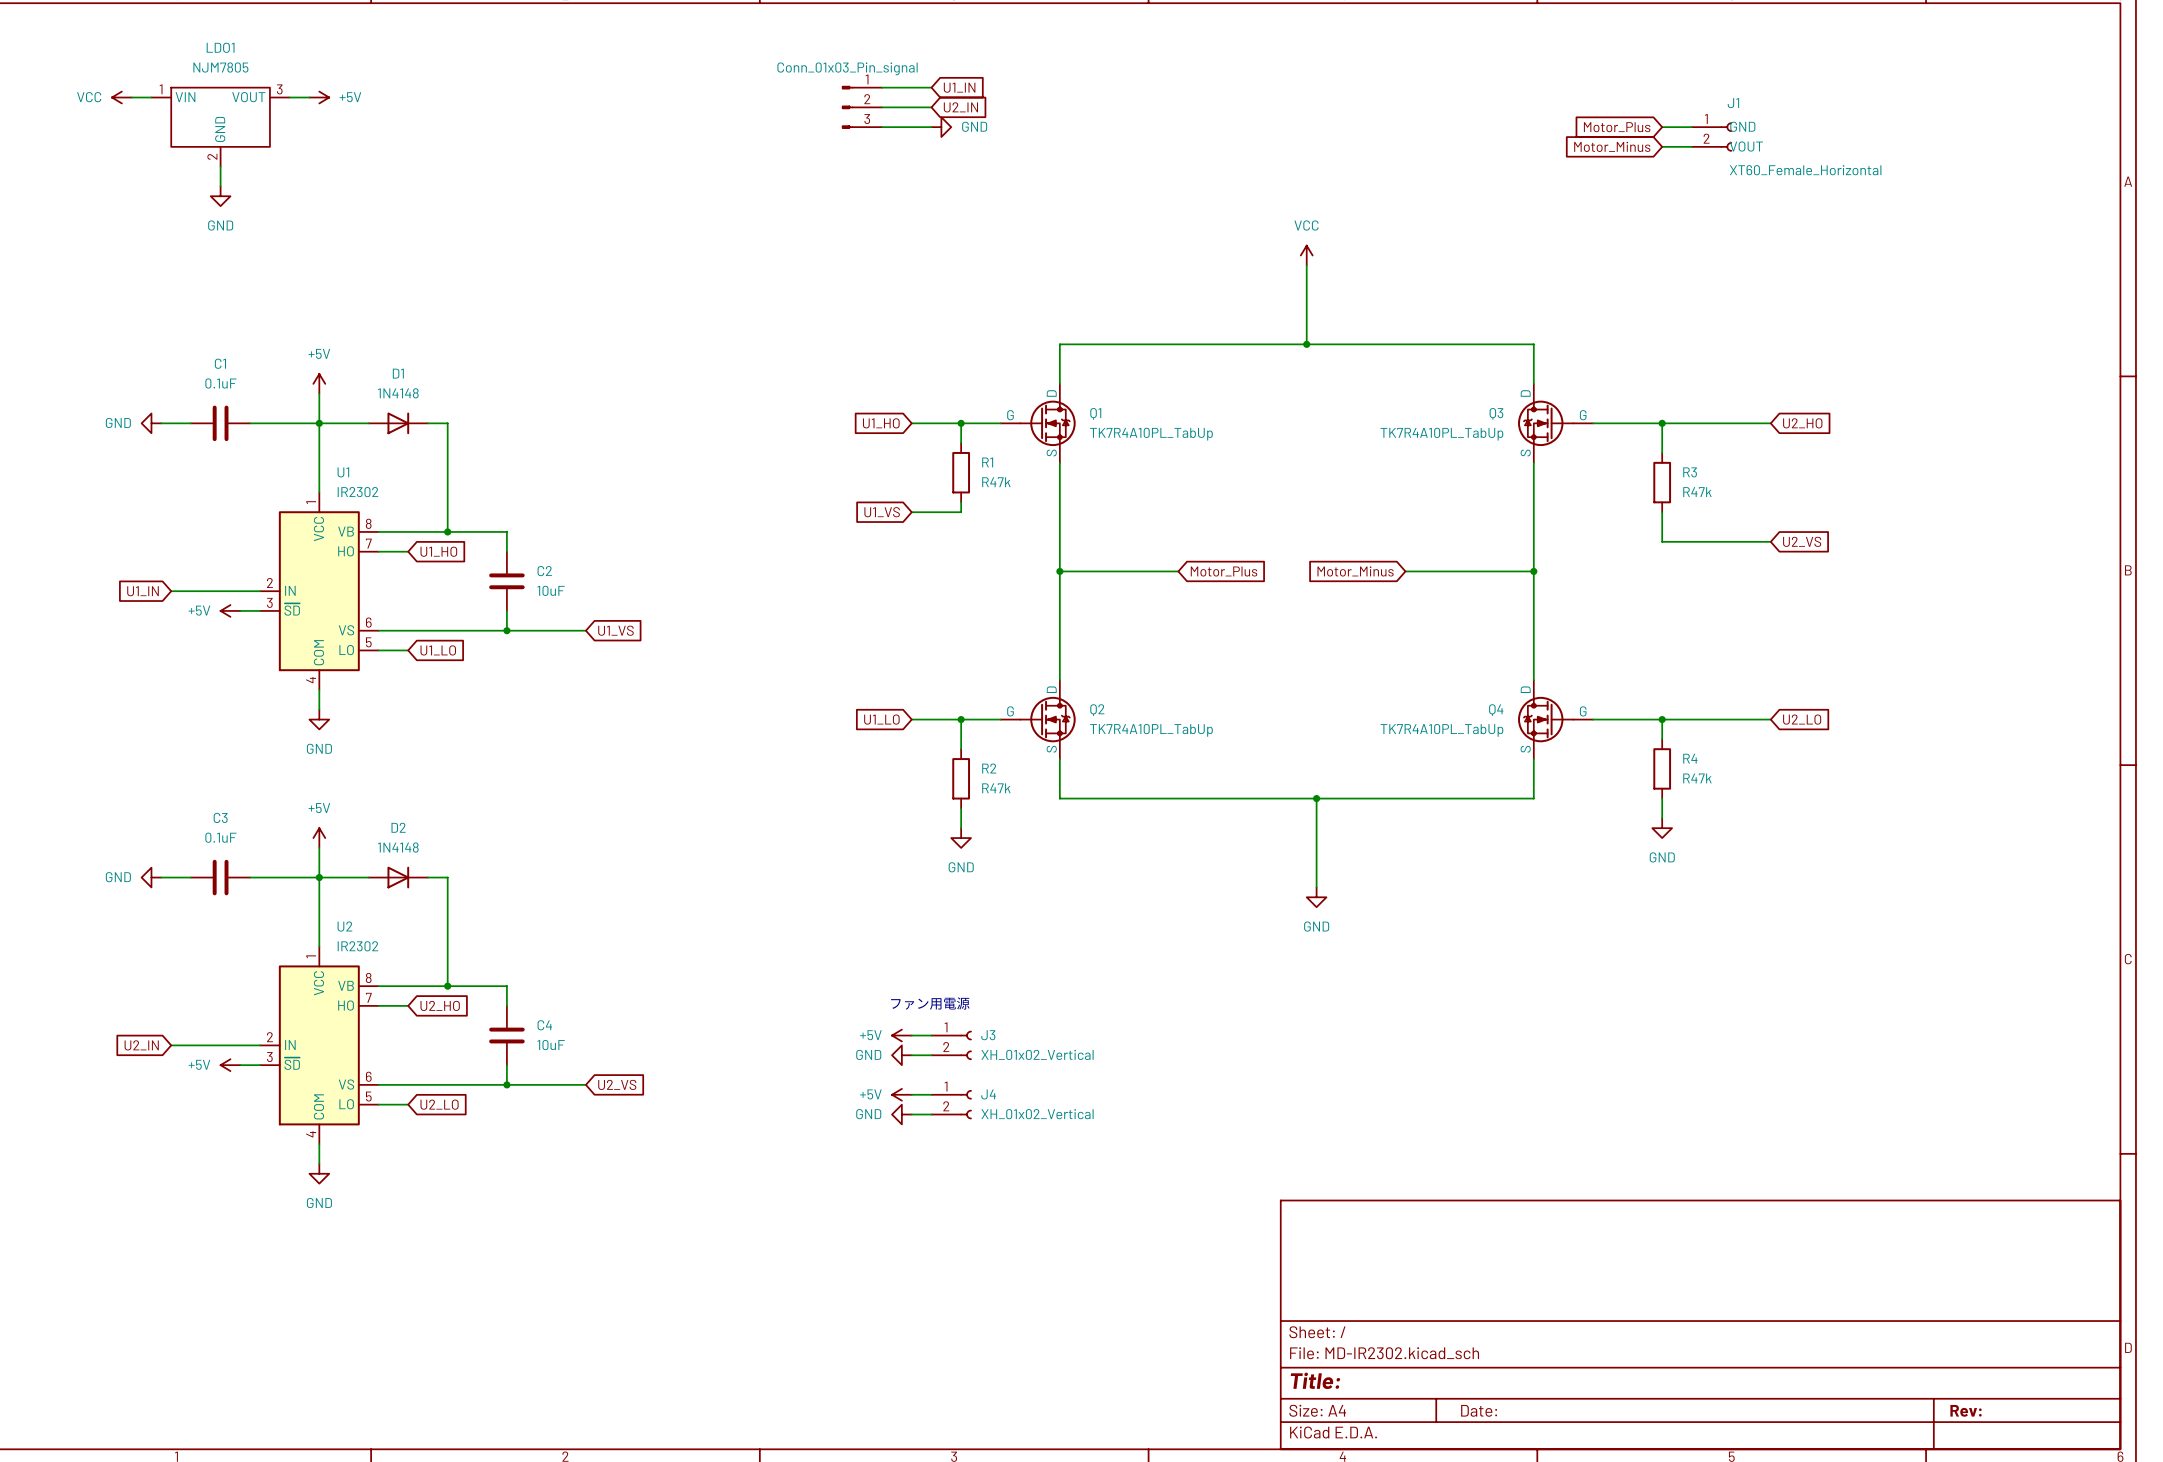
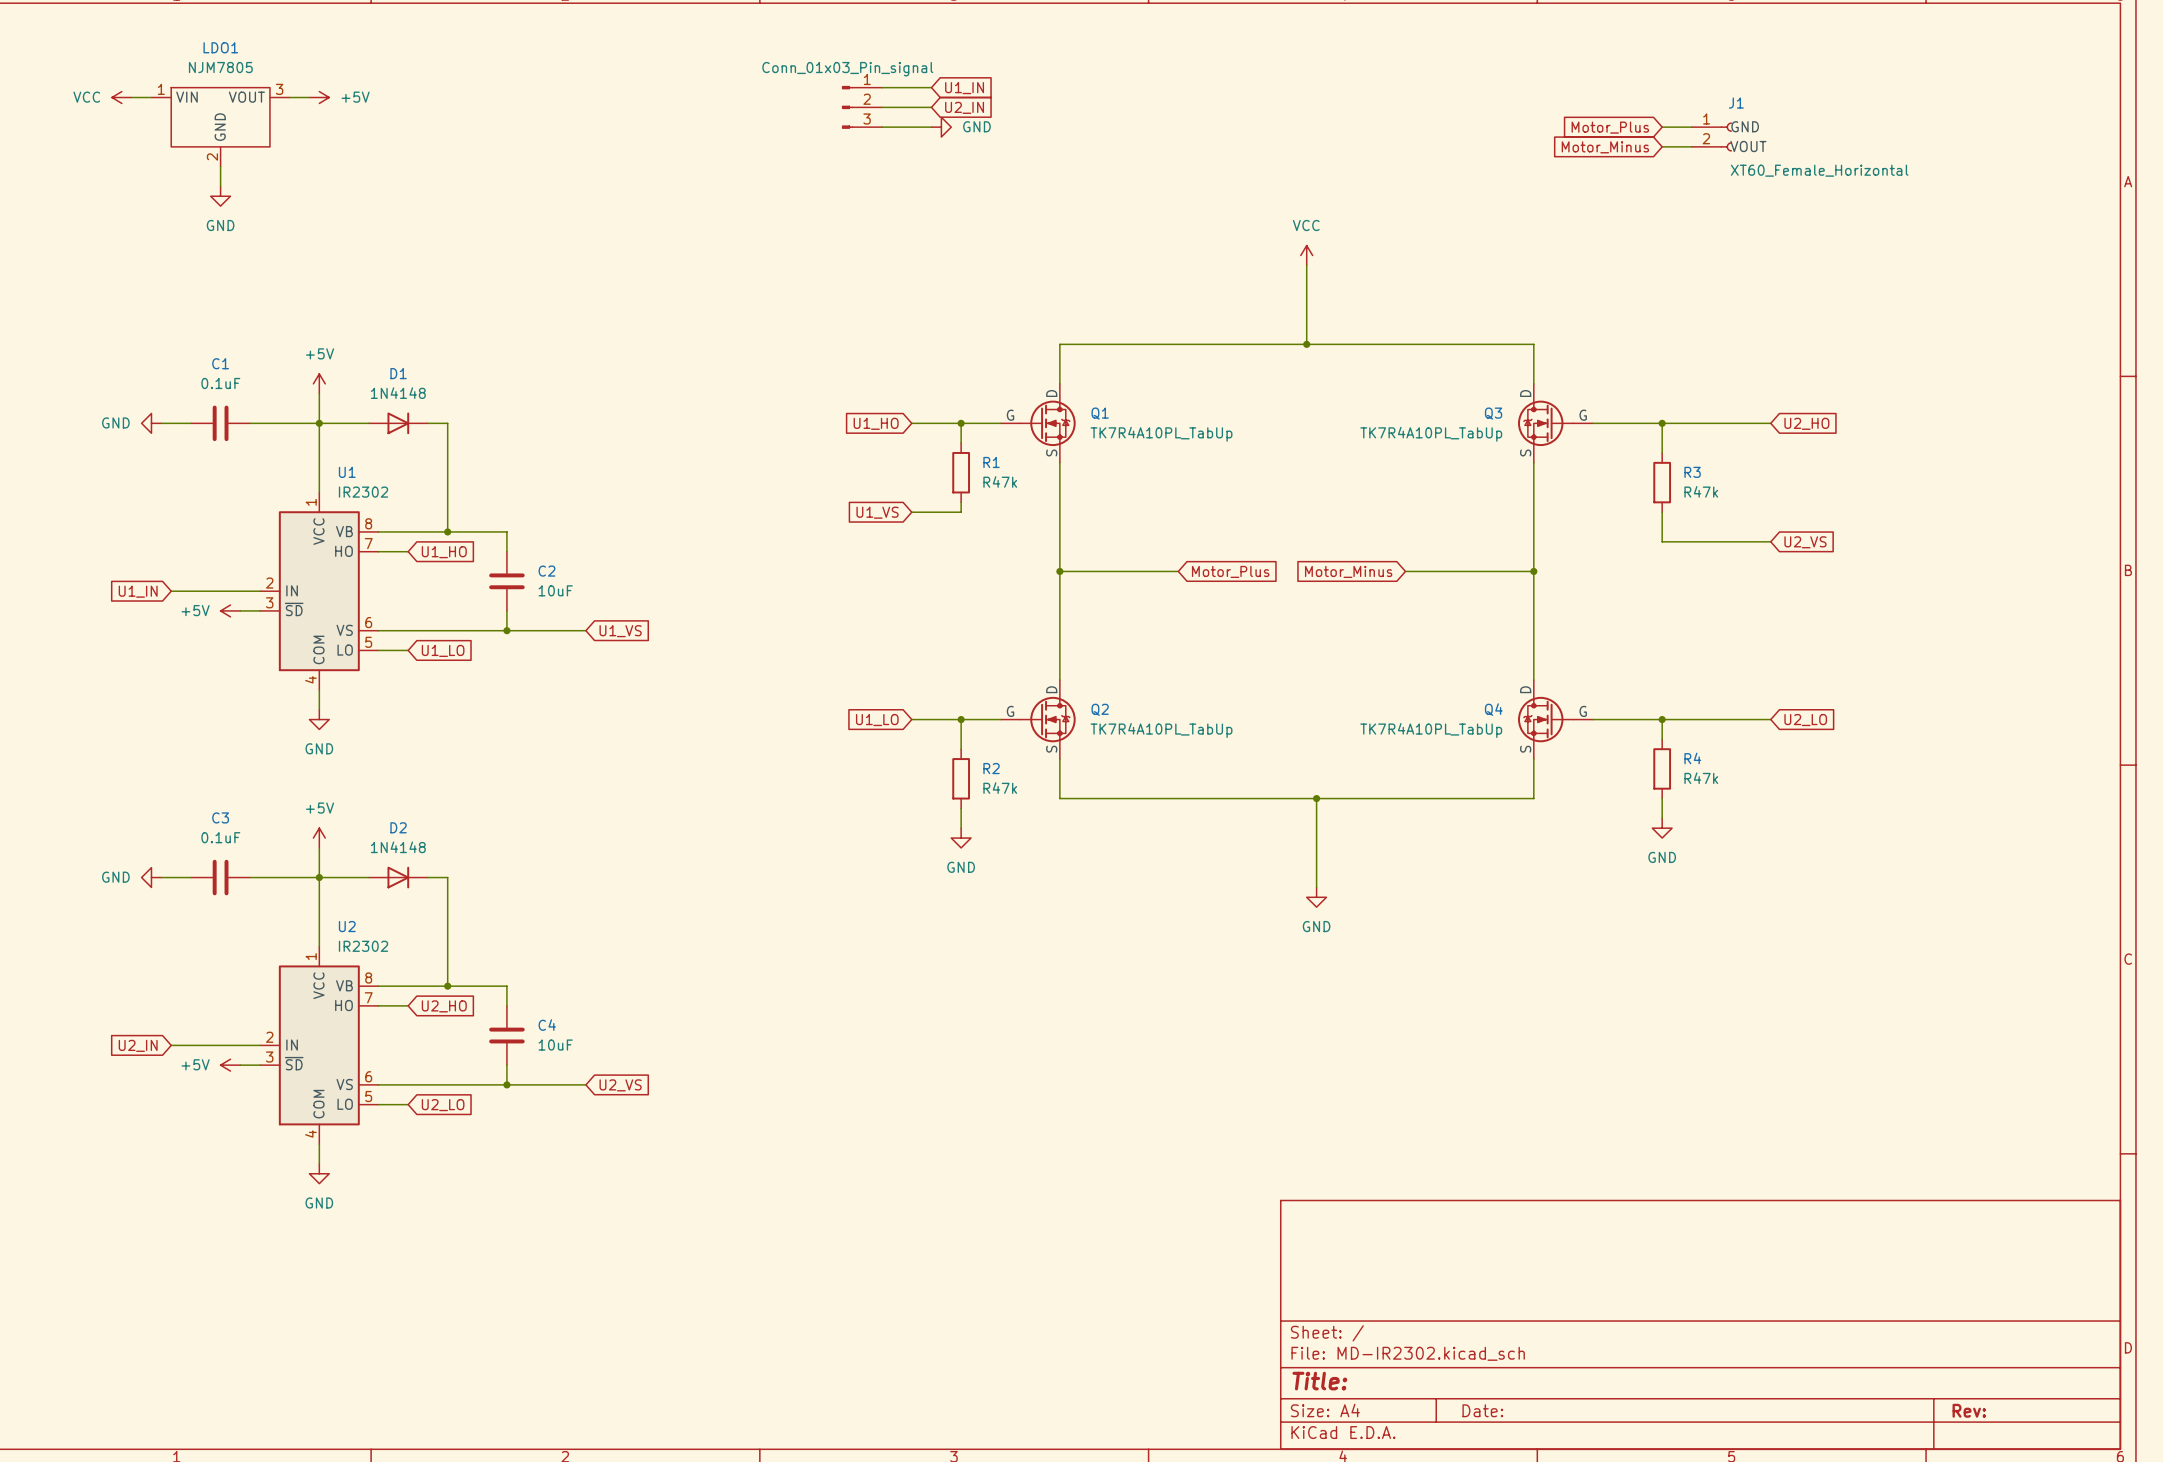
text: ファン用電源 (930, 1003) -> none
power symbol: +5V (901, 1035) -> none
wire: (911, 1035) (931, 1035) -> none
J3: XH_01x02_Vertical (951, 1045) -> none
power symbol: GND (901, 1055) -> none
wire: (911, 1055) (931, 1055) -> none
power symbol: +5V (901, 1094) -> none
wire: (911, 1094) (931, 1094) -> none
J4: XH_01x02_Vertical (951, 1104) -> none
power symbol: GND (901, 1114) -> none
wire: (911, 1114) (931, 1114) -> none

